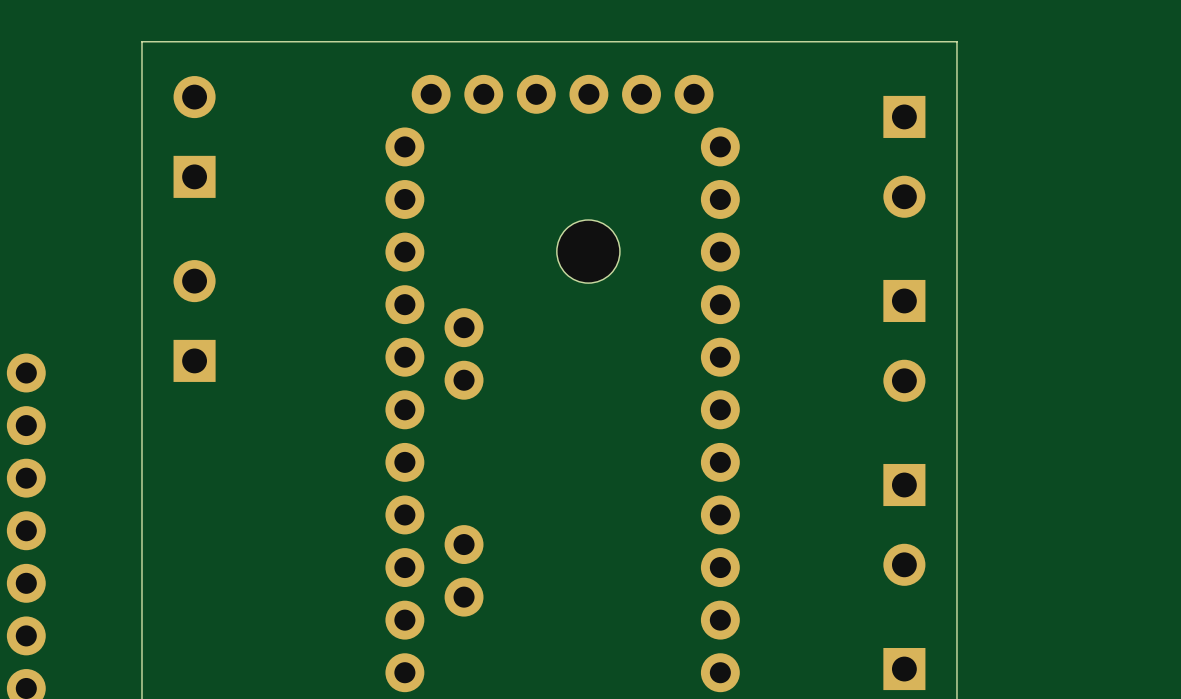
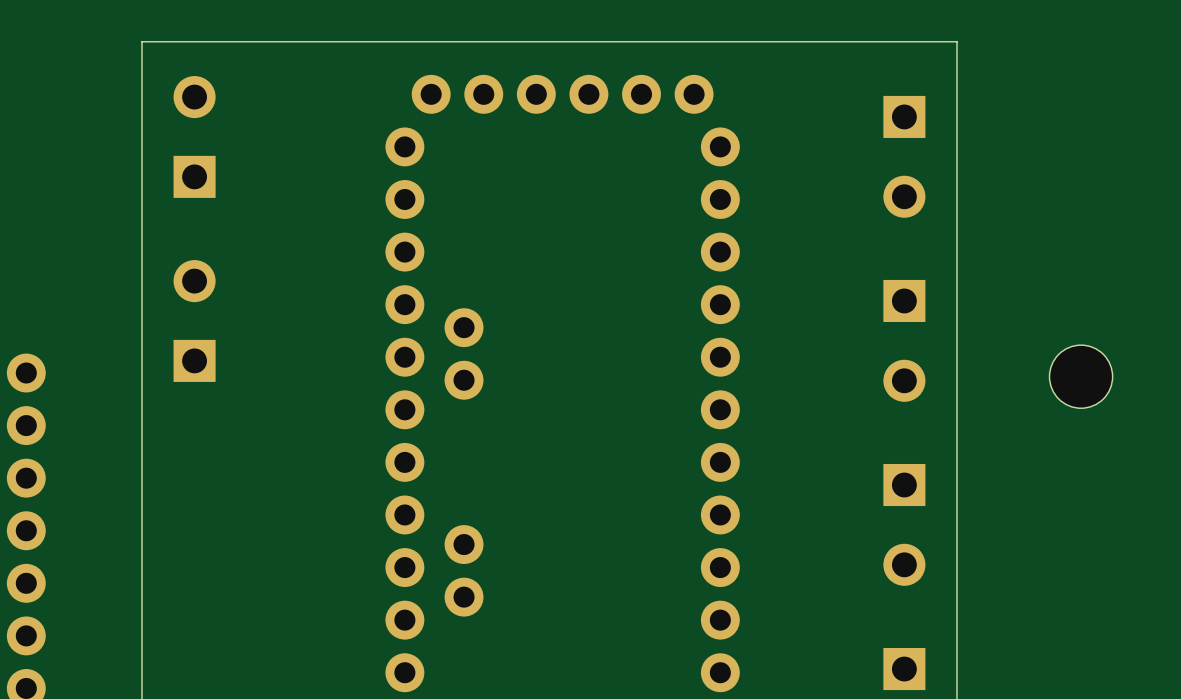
part position: (588, 251) -> (1081, 376)

